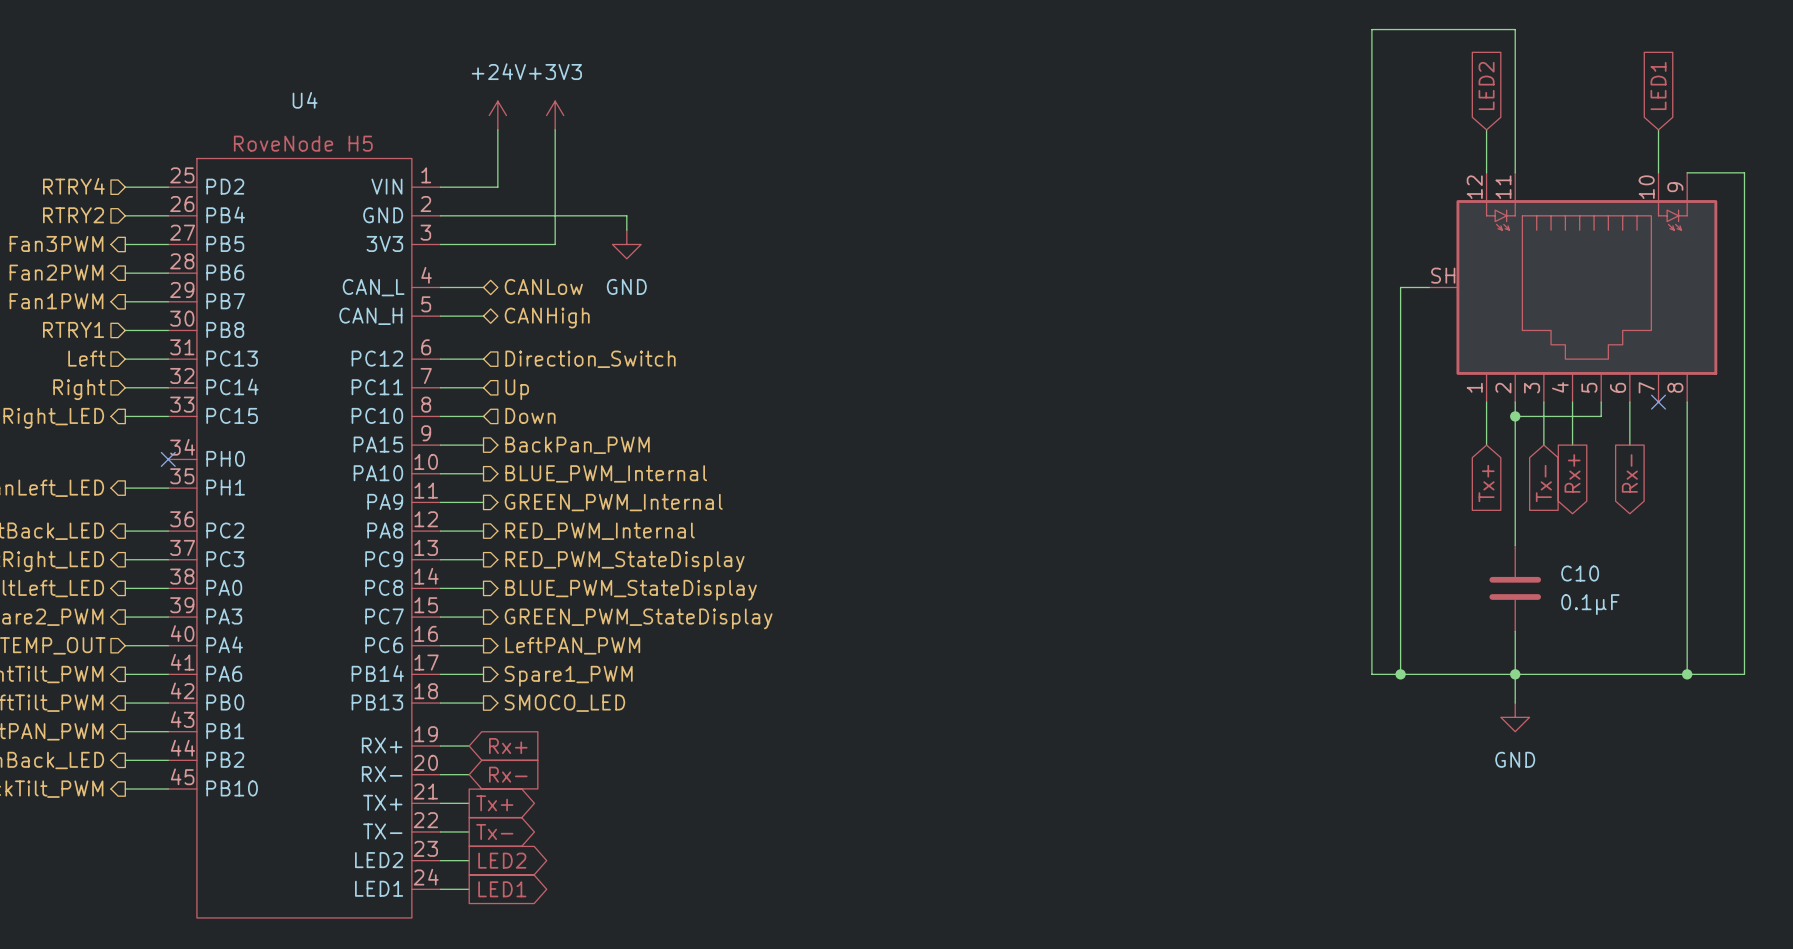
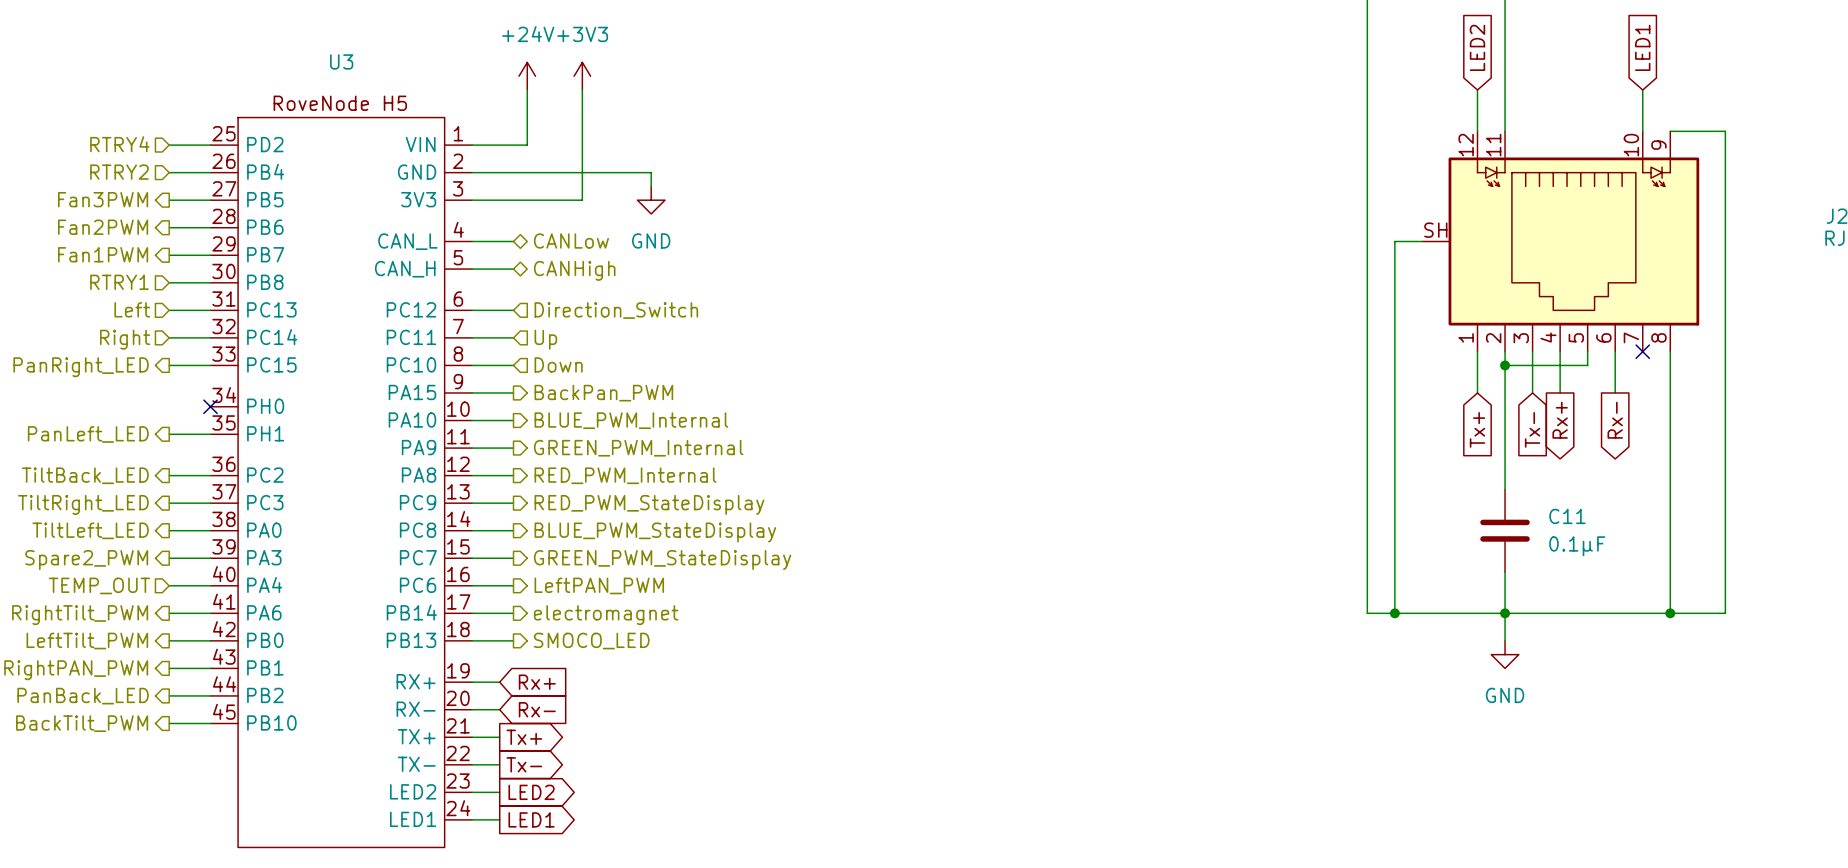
U4 name: U4 (305, 100) -> U3 (341, 61)
C10 name: C10 (1580, 573) -> C11 (1567, 516)
hierarchical label: Spare1_PWM (568, 676) -> electromagnet (606, 615)

